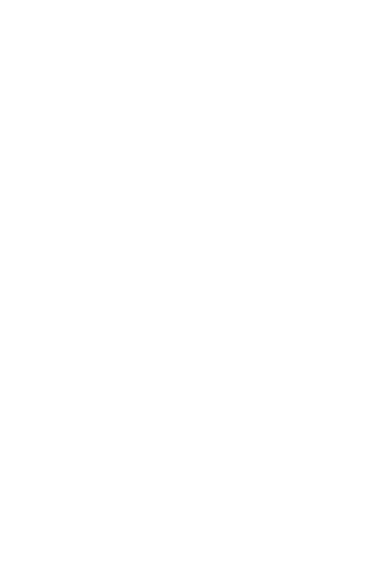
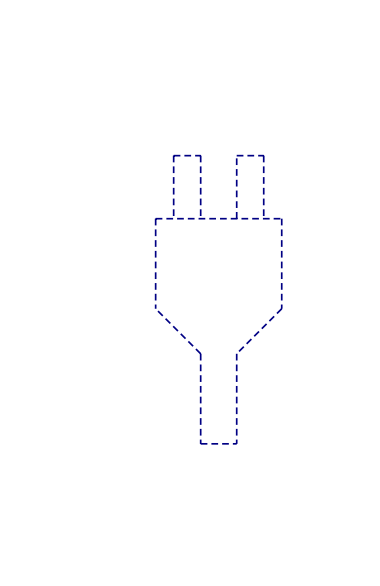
line: none -> (155, 218) (155, 308) (200, 353) (200, 443) (236, 443) (236, 353) (281, 308) (281, 218) (155, 218)
line: none -> (173, 218) (173, 155) (200, 155) (200, 218)
line: none -> (236, 218) (236, 155) (263, 155) (263, 218)

